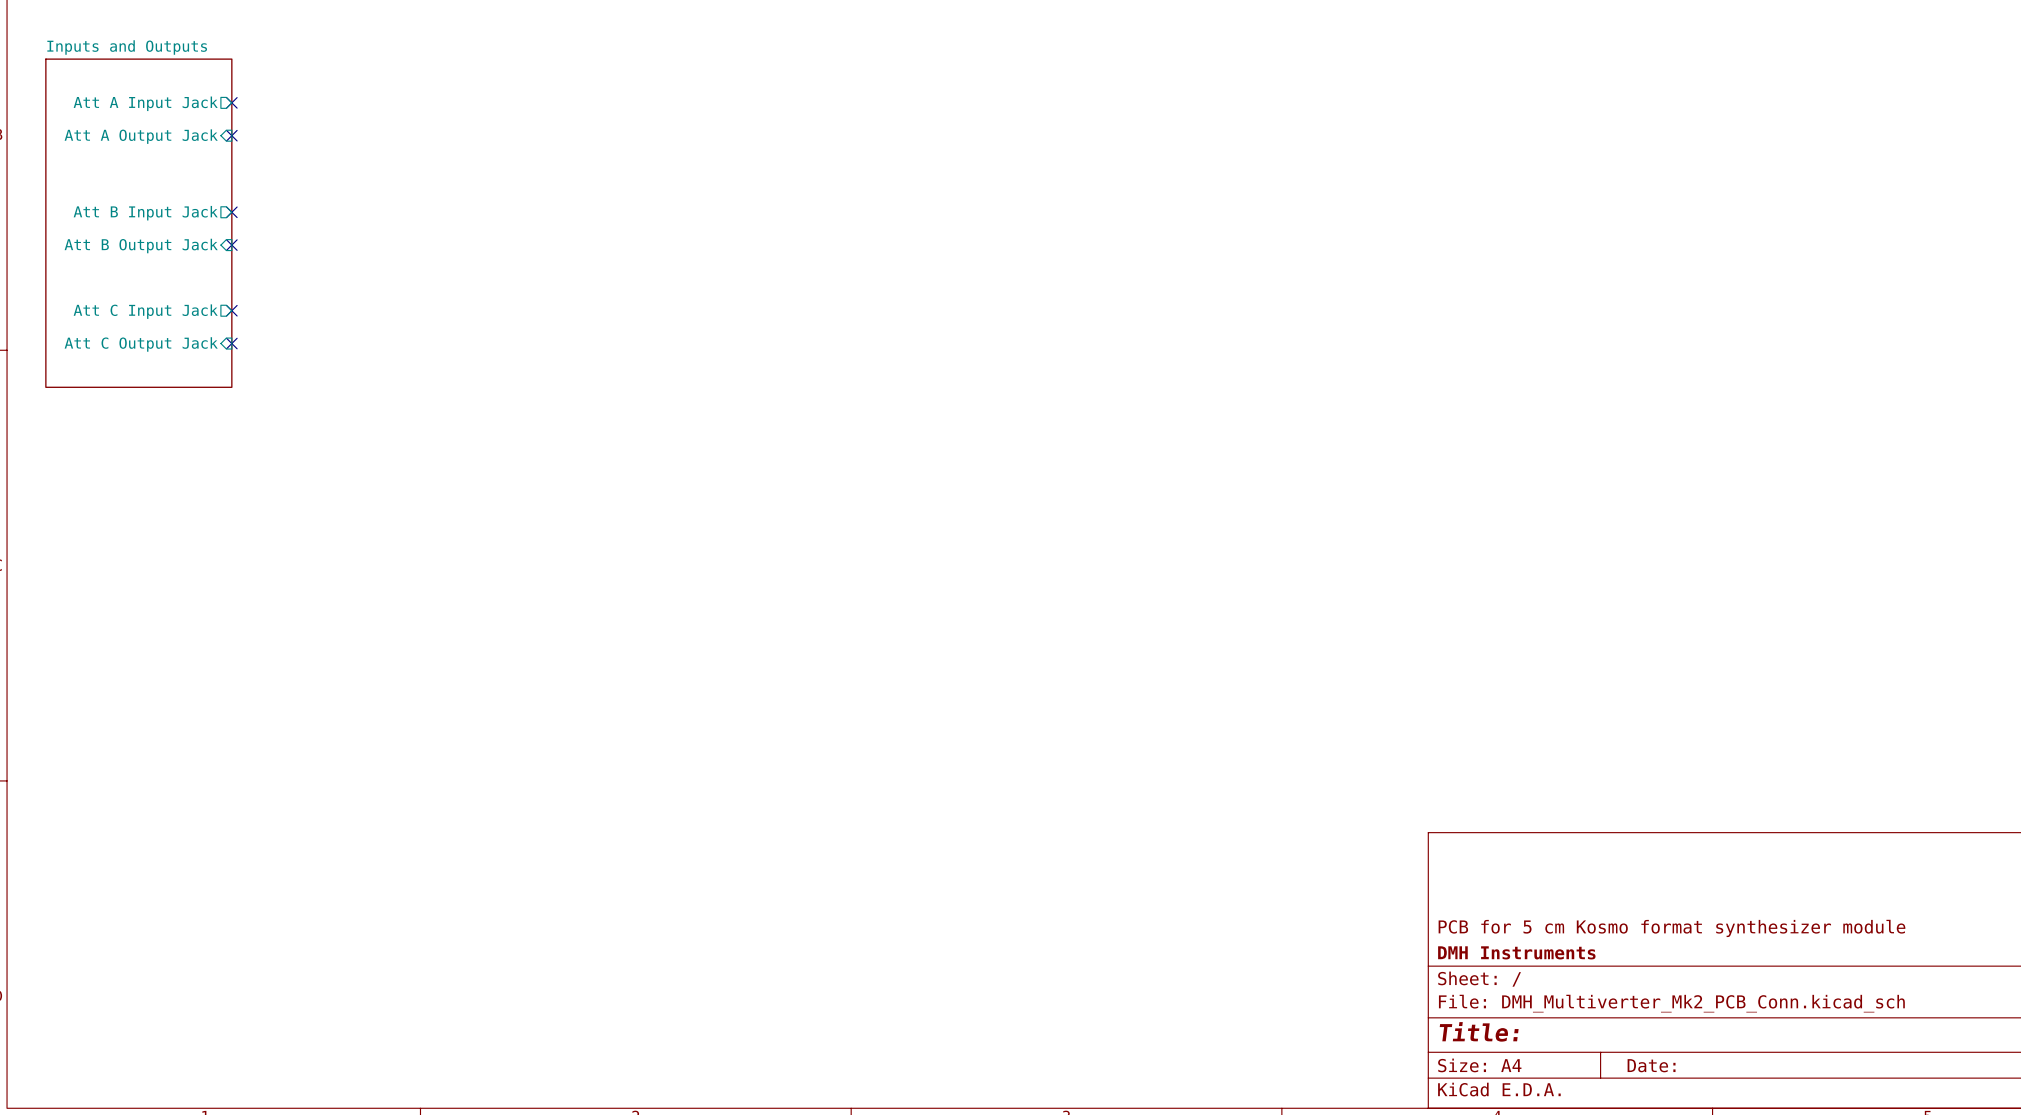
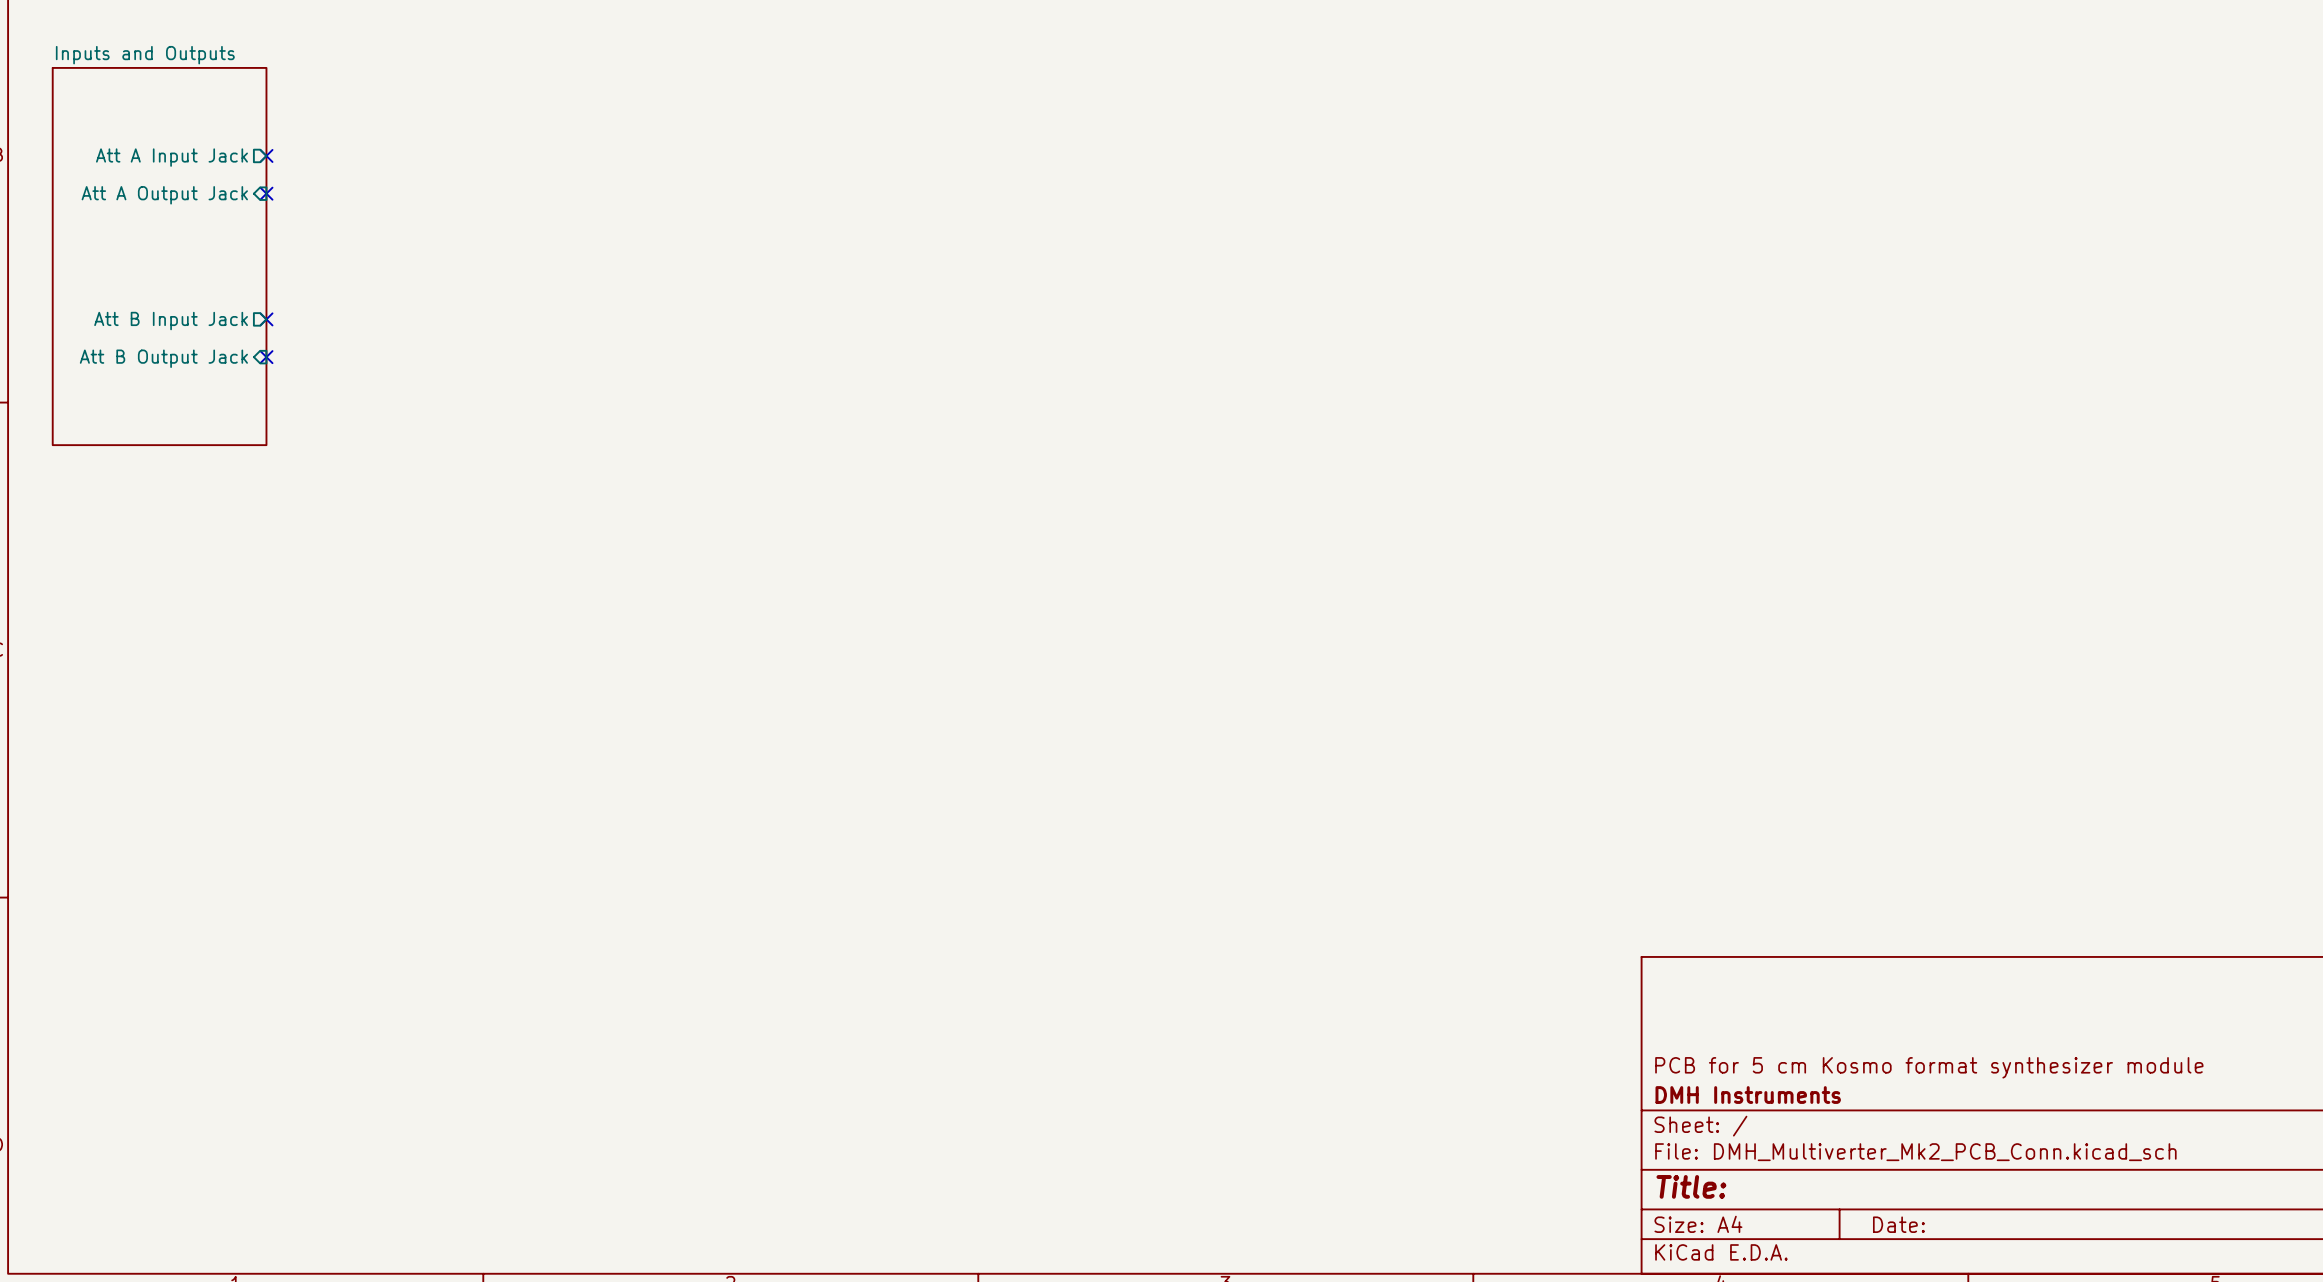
no-connect mark: (231, 102) -> none
sheet pin: Att A Input Jack (145, 103) -> none
sheet pin shape: input (141, 136) -> output (171, 157)
sheet pin: Att A Output Jack (141, 136) -> Att A Input Jack (171, 157)
no-connect mark: none -> (266, 193)
sheet pin: none -> Att A Output Jack (164, 195)
no-connect mark: (231, 212) -> none
sheet pin position: Att B Input Jack (145, 213) -> Att B Input Jack (171, 321)
no-connect mark: (231, 245) -> none
sheet pin: Att B Output Jack (141, 246) -> none
no-connect mark: none -> (266, 319)
sheet pin shape: output (145, 311) -> input (163, 358)
sheet pin: Att C Input Jack (145, 311) -> Att B Output Jack (163, 358)
no-connect mark: (231, 343) -> none
sheet pin: Att C Output Jack (141, 344) -> none

